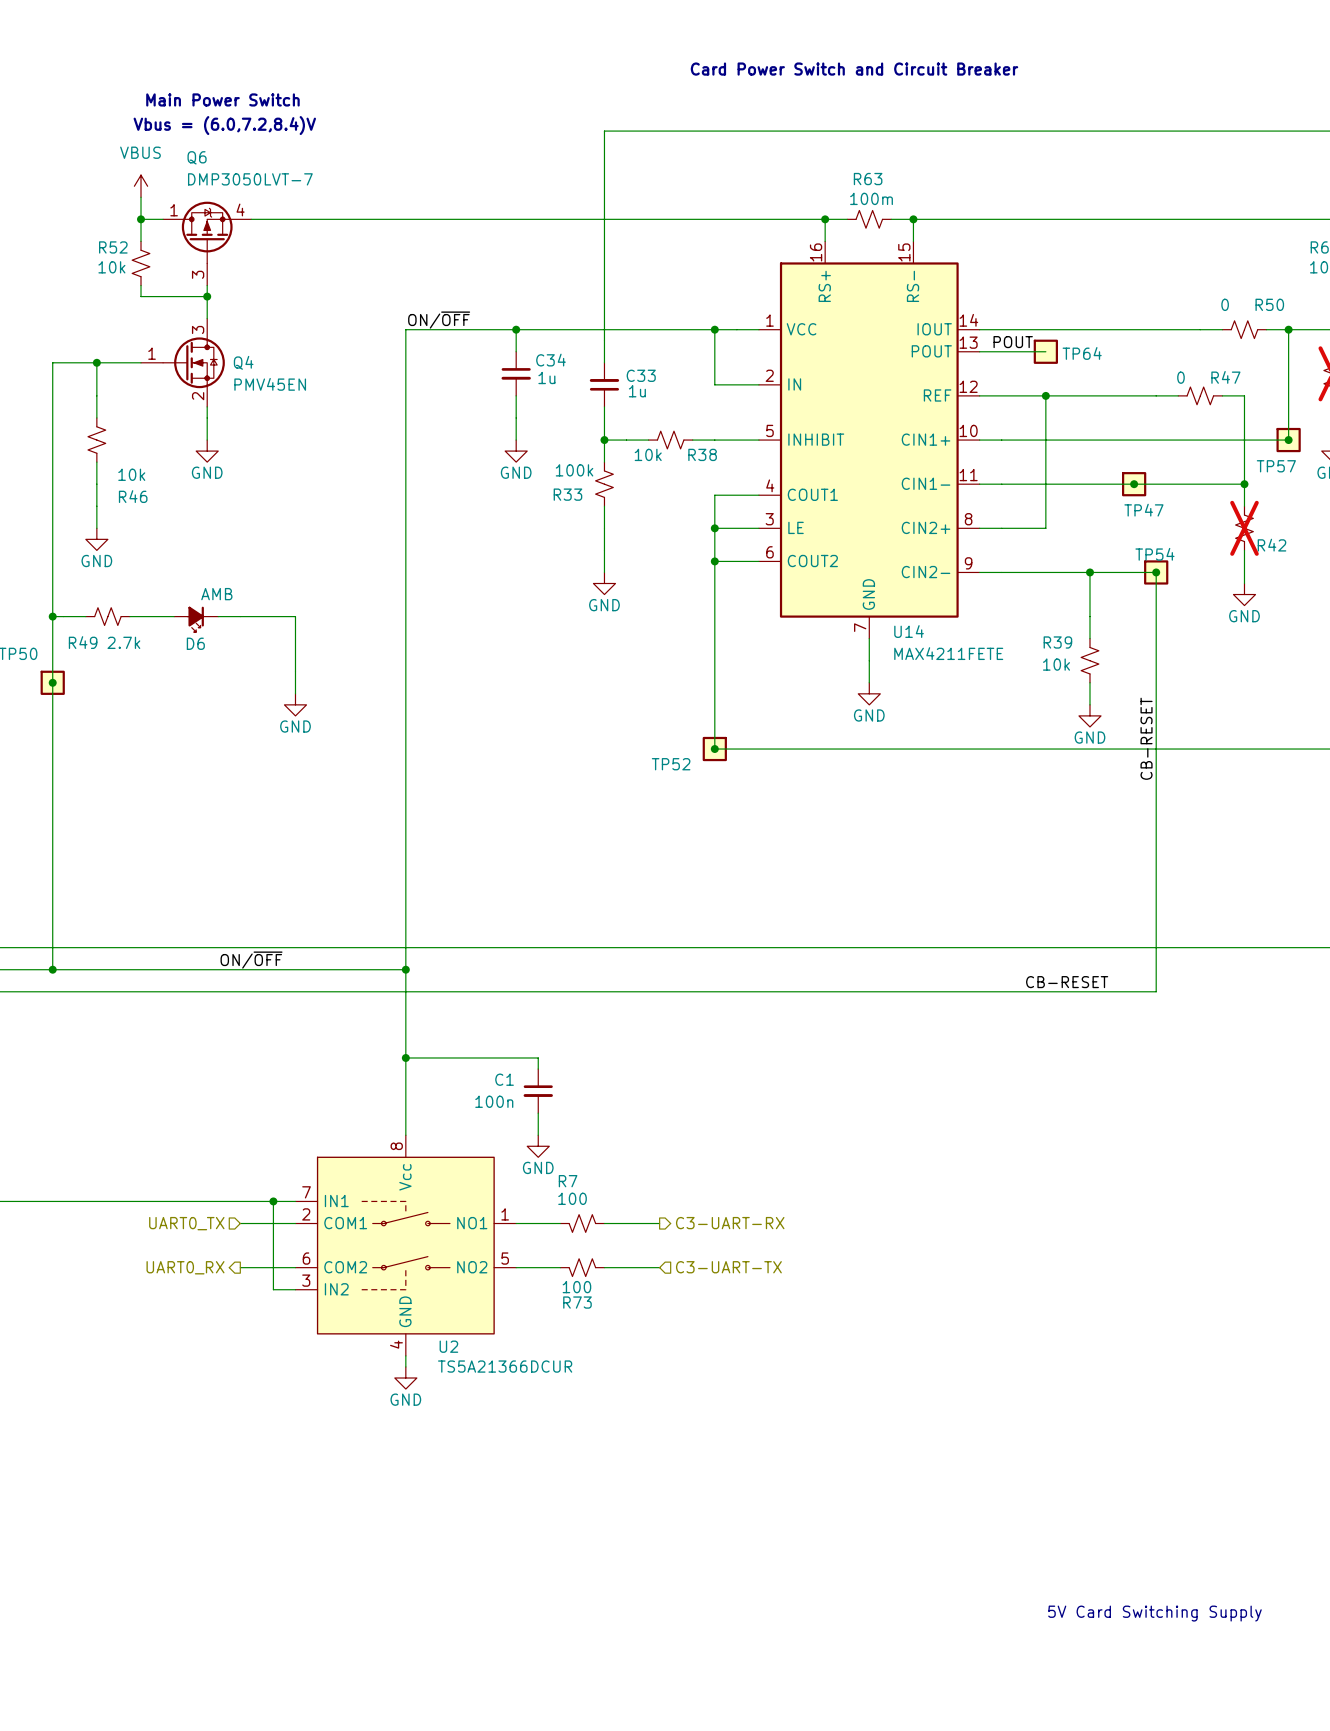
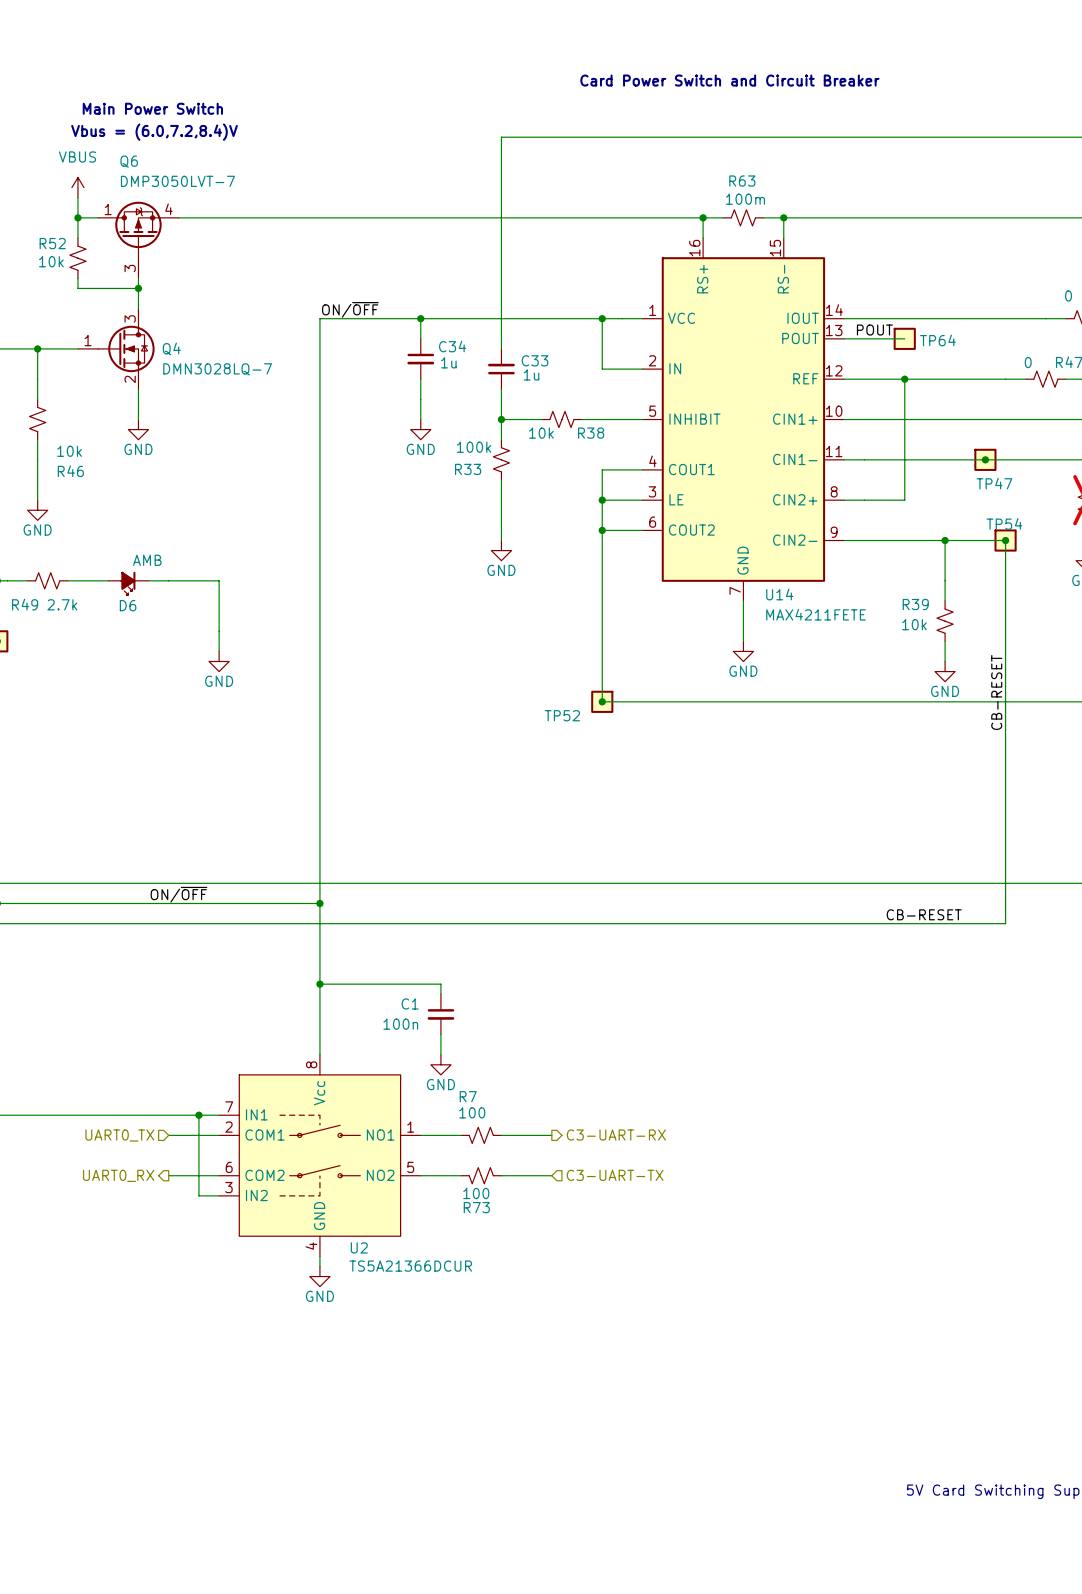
Q4 value: PMV45EN (270, 384) -> DMN3028LQ-7 (217, 369)

